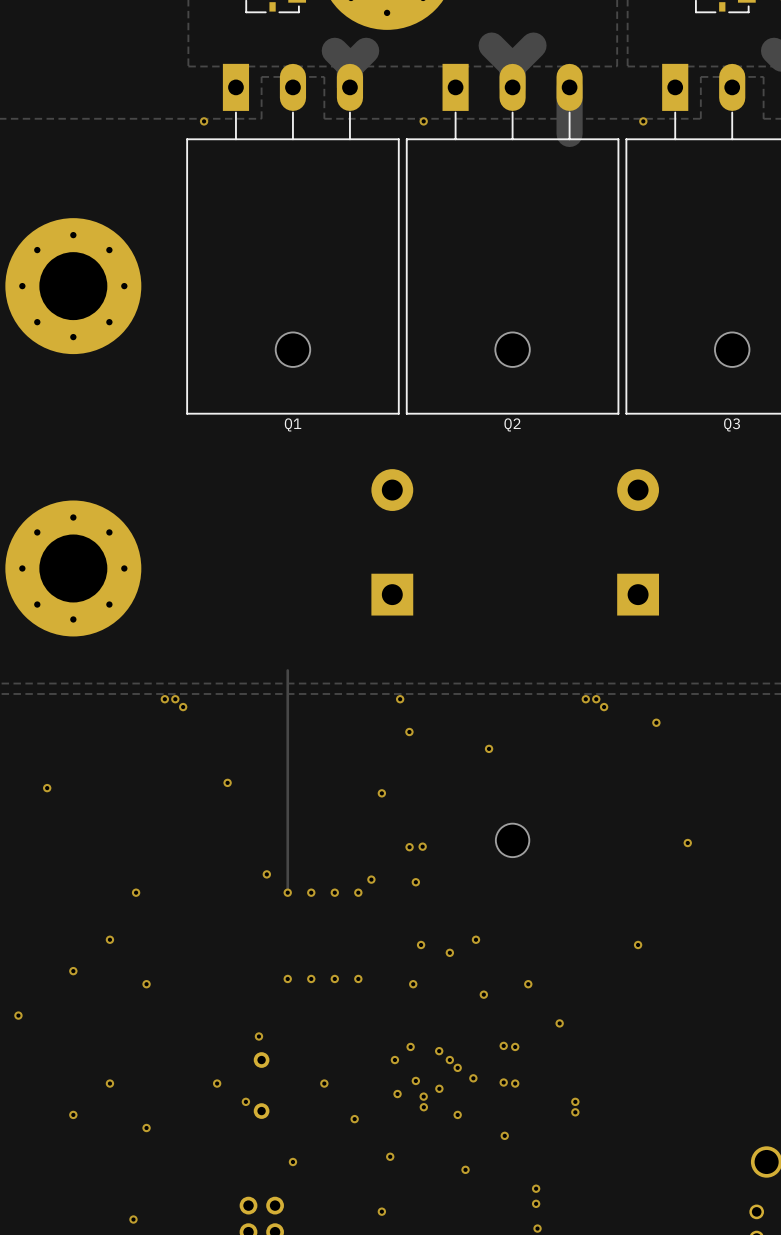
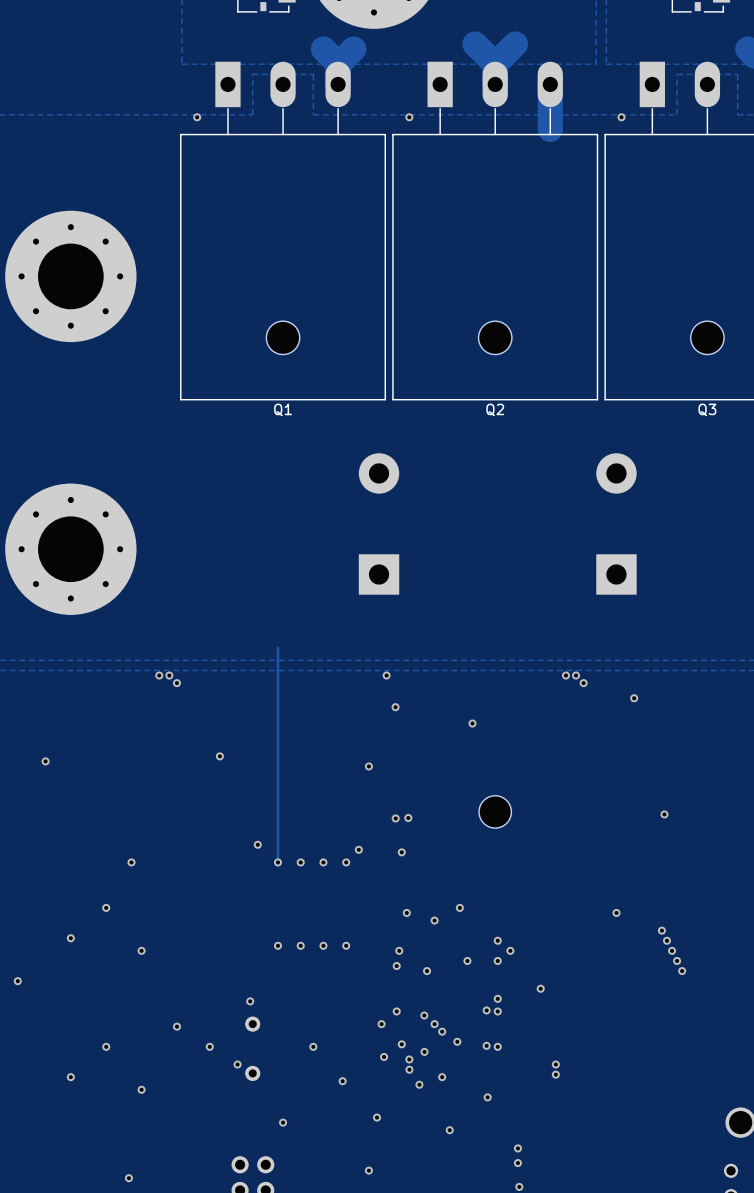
via: none -> (661, 930)
via: none -> (497, 940)
via: none -> (666, 940)
via: none -> (672, 950)
via: none -> (497, 960)
via: none -> (677, 960)
via: none -> (396, 966)
via: none -> (427, 971)
via: none -> (682, 971)
via: none -> (497, 998)
via: none -> (176, 1026)
via: none -> (419, 1084)

